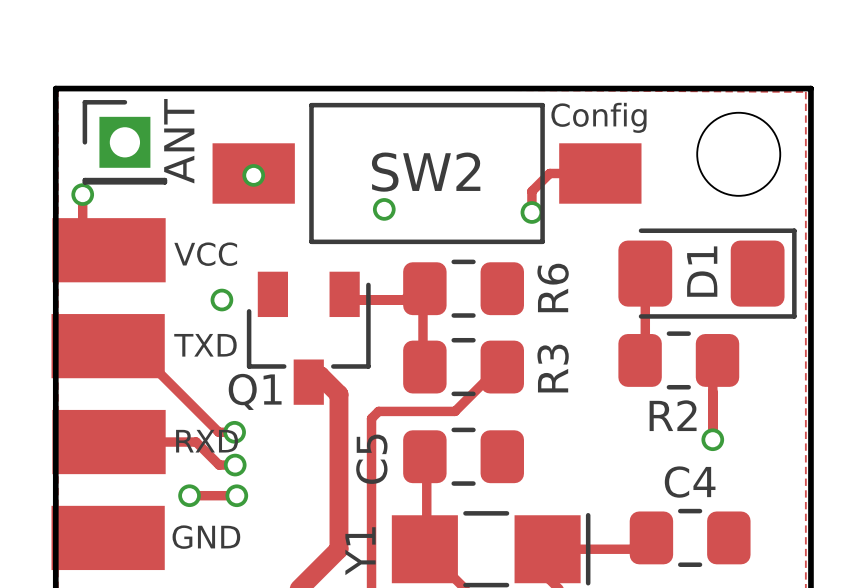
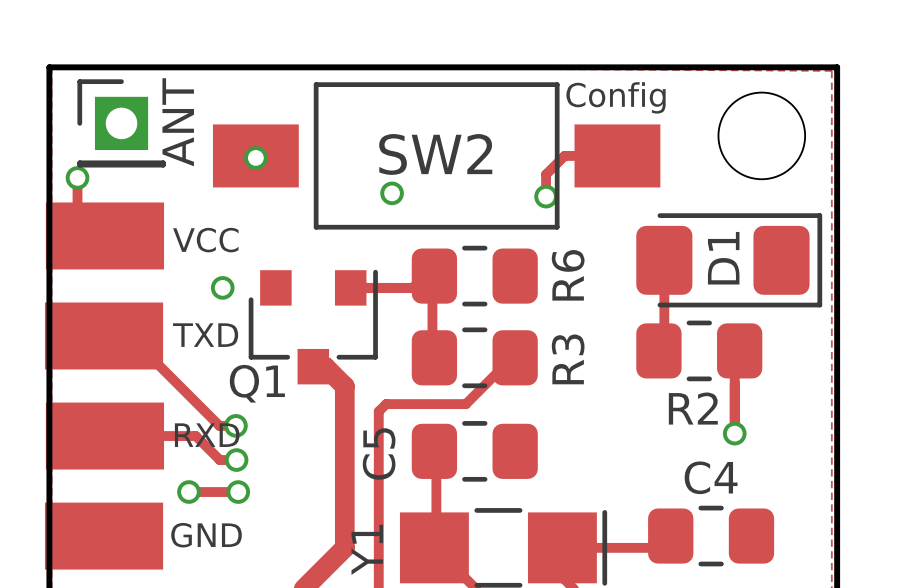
Q1 footprint: [246, 271, 371, 405] -> [248, 269, 378, 385]

